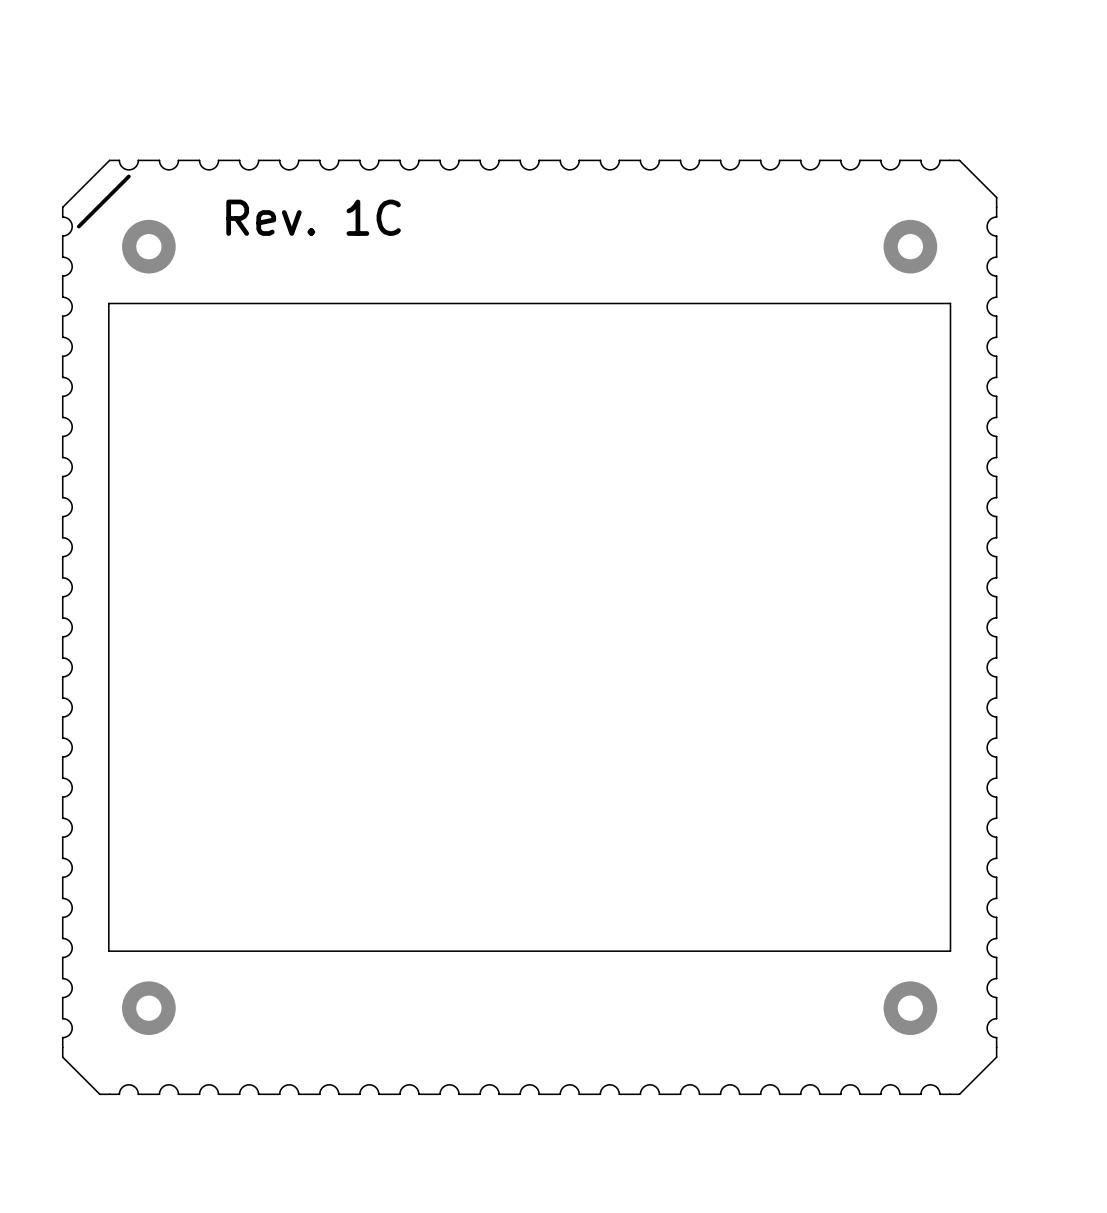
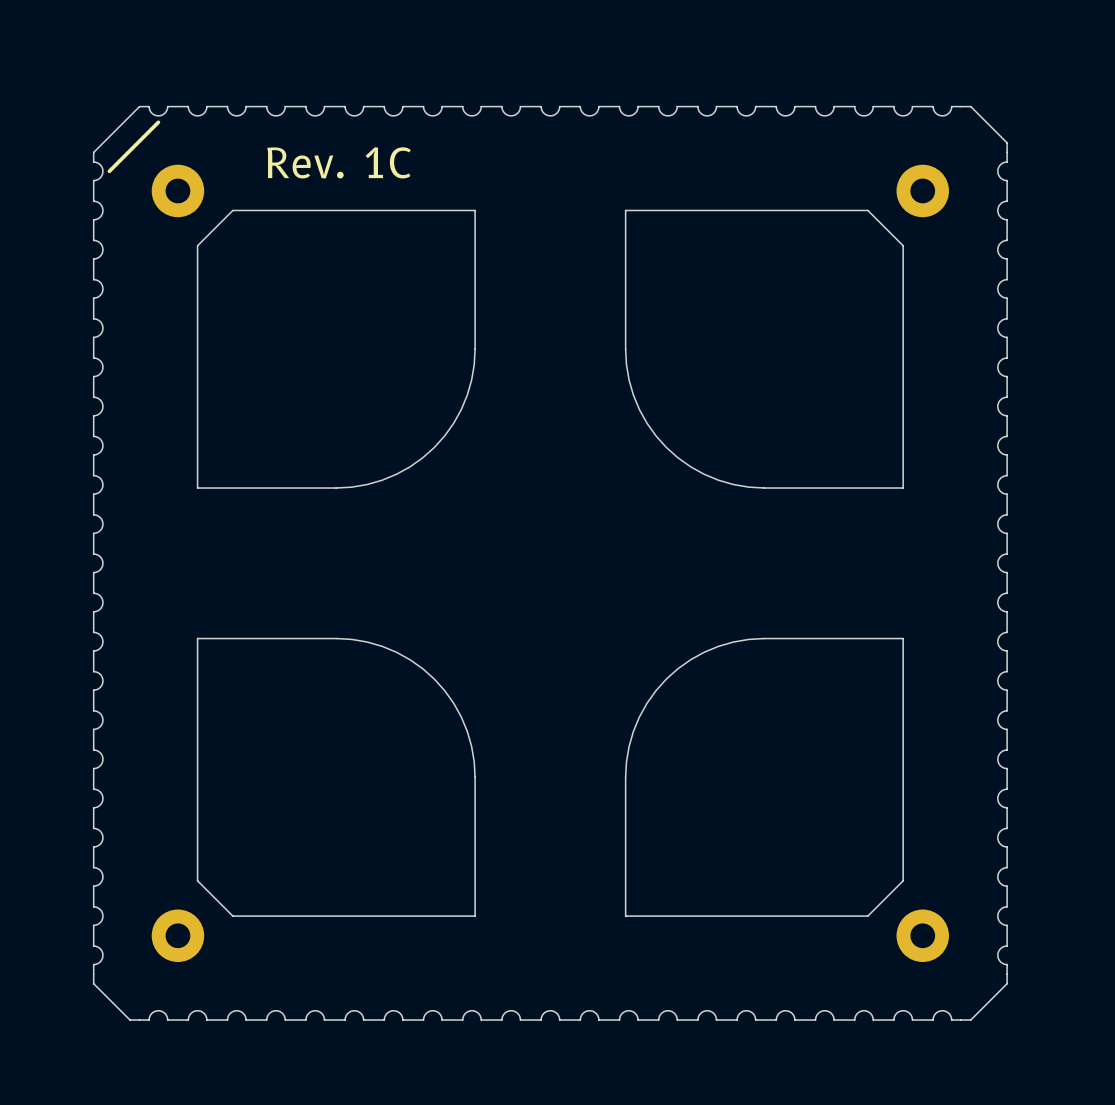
board edge: none -> (232, 210) (197, 245) (197, 488) (351, 487) (382, 480) (396, 474) (422, 457) (434, 447) (453, 423) (467, 395) (471, 380) (475, 349) (475, 210) (232, 210)
board edge: none -> (625, 210) (867, 210) (903, 245) (903, 488) (764, 488) (733, 484) (704, 474) (677, 457) (666, 447) (655, 435) (639, 409) (629, 380) (625, 349) (625, 210)
board edge: (108, 303) (950, 303) (950, 951) (108, 951) (108, 303) -> none
board edge: none -> (197, 638) (197, 880) (232, 916) (475, 916) (475, 777) (471, 746) (467, 731) (453, 703) (434, 679) (410, 659) (382, 646) (367, 642) (336, 638) (197, 638)
board edge: none -> (764, 638) (903, 638) (903, 880) (867, 916) (625, 916) (626, 761) (633, 731) (639, 717) (655, 690) (666, 679) (690, 659) (718, 646) (748, 639) (764, 638)

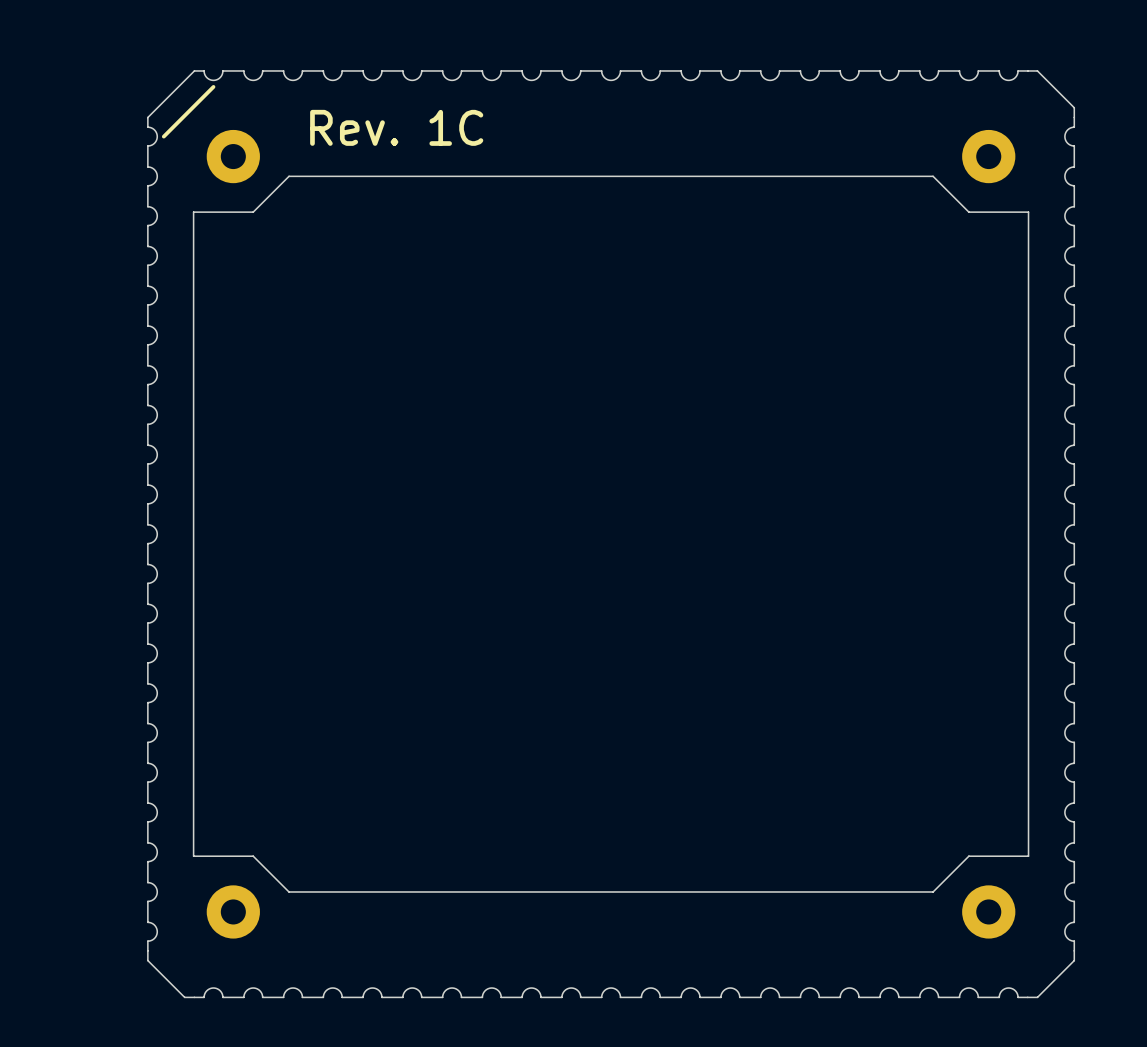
board edge: (475, 210) (474, 364) (467, 395) (461, 409) (444, 435) (422, 457) (396, 474) (382, 480) (351, 487) (197, 488) (197, 245) -> (534, 176) (687, 176)
board edge: (625, 210) (626, 364) (633, 395) (639, 409) (655, 435) (677, 457) (704, 474) (718, 480) (748, 487) (903, 488) (903, 245) -> (968, 856) (1028, 856) (1028, 212) (968, 212)
board edge: none -> (253, 212) (193, 212) (193, 856) (253, 856)
board edge: (197, 880) (197, 638) (351, 639) (382, 646) (410, 659) (434, 679) (453, 703) (461, 717) (467, 731) (474, 761) (475, 916) -> (687, 891) (534, 891)
board edge: (903, 880) (903, 638) (748, 639) (718, 646) (690, 659) (666, 679) (655, 690) (639, 717) (633, 731) (626, 761) (625, 916) -> none

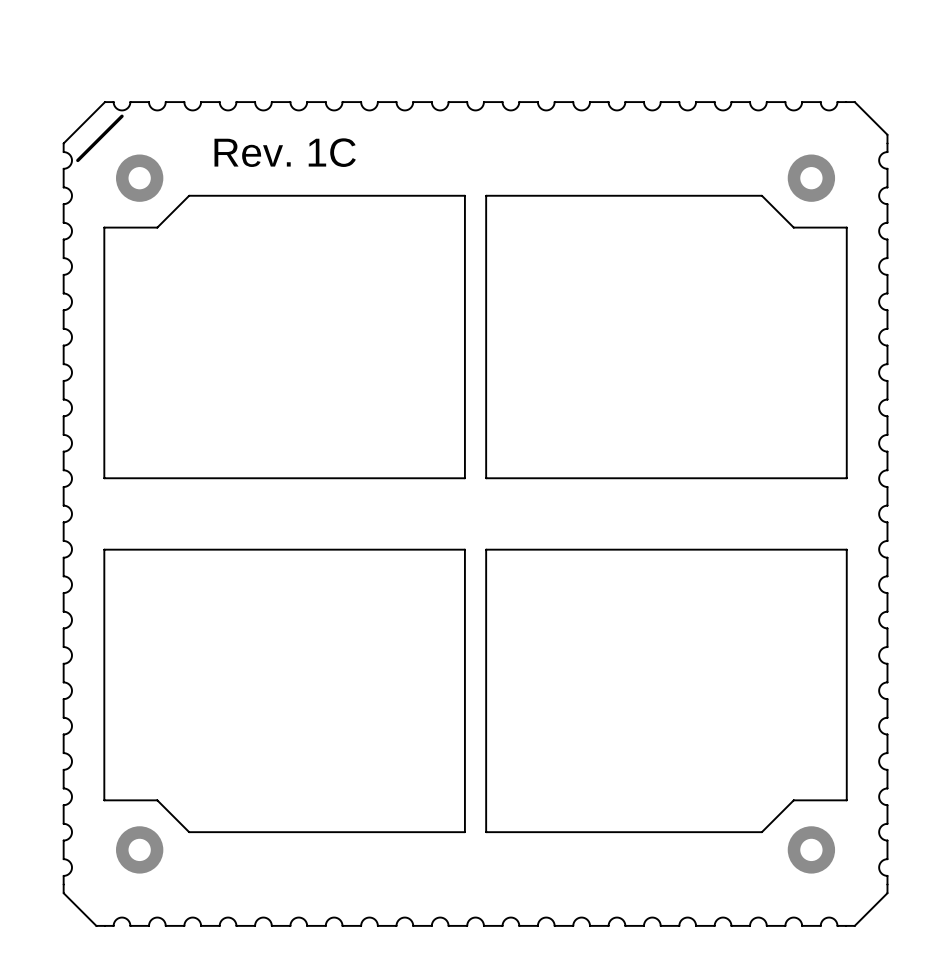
board edge: (599, 176) (622, 176) -> (464, 195) (464, 478) (104, 478)
board edge: (193, 494) (193, 574) -> none
board edge: (1028, 494) (1028, 574) -> (846, 478) (486, 478) (486, 195)
board edge: none -> (846, 549) (486, 549) (486, 832)
board edge: (599, 891) (622, 891) -> (464, 832) (464, 549) (104, 549)

